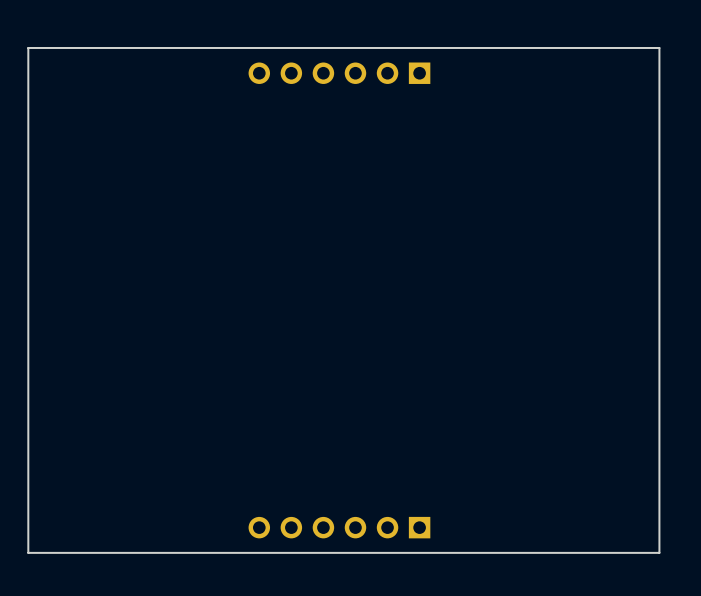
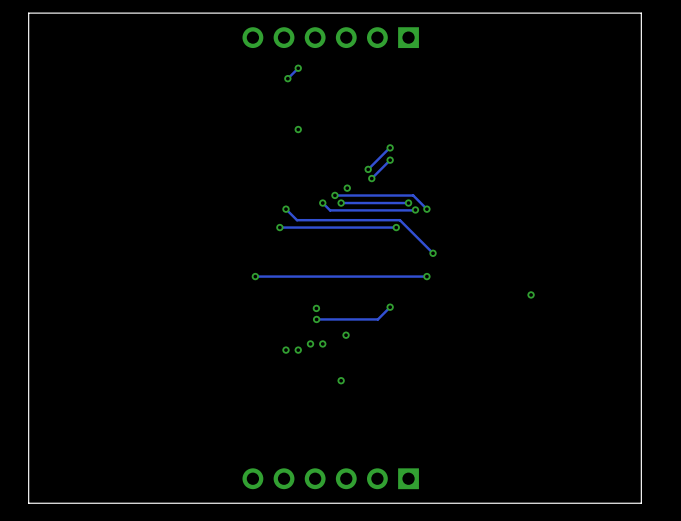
track: none -> (298, 68) (287, 78)
via: none -> (298, 68)
via: none -> (287, 78)
via: none -> (298, 129)
track: none -> (390, 147) (368, 169)
via: none -> (390, 147)
track: none -> (390, 160) (371, 178)
via: none -> (390, 160)
via: none -> (368, 169)
via: none -> (371, 178)
via: none -> (347, 188)
track: none -> (335, 195) (413, 195) (426, 209)
via: none -> (334, 195)
track: none -> (322, 203) (330, 210) (415, 209)
via: none -> (322, 203)
via: none -> (341, 203)
track: none -> (408, 203) (341, 203)
via: none -> (408, 203)
track: none -> (285, 209) (297, 220) (399, 220) (433, 253)
via: none -> (285, 209)
via: none -> (426, 209)
via: none -> (415, 209)
via: none -> (279, 227)
track: none -> (396, 227) (279, 227)
via: none -> (396, 227)
via: none -> (433, 253)
via: none -> (255, 276)
track: none -> (426, 276) (255, 276)
via: none -> (426, 276)
via: none -> (531, 294)
track: none -> (390, 307) (377, 319) (316, 319)
via: none -> (390, 307)
via: none -> (316, 308)
via: none -> (316, 319)
via: none -> (346, 335)
via: none -> (310, 343)
via: none -> (322, 343)
via: none -> (285, 350)
via: none -> (298, 350)
via: none -> (341, 380)

